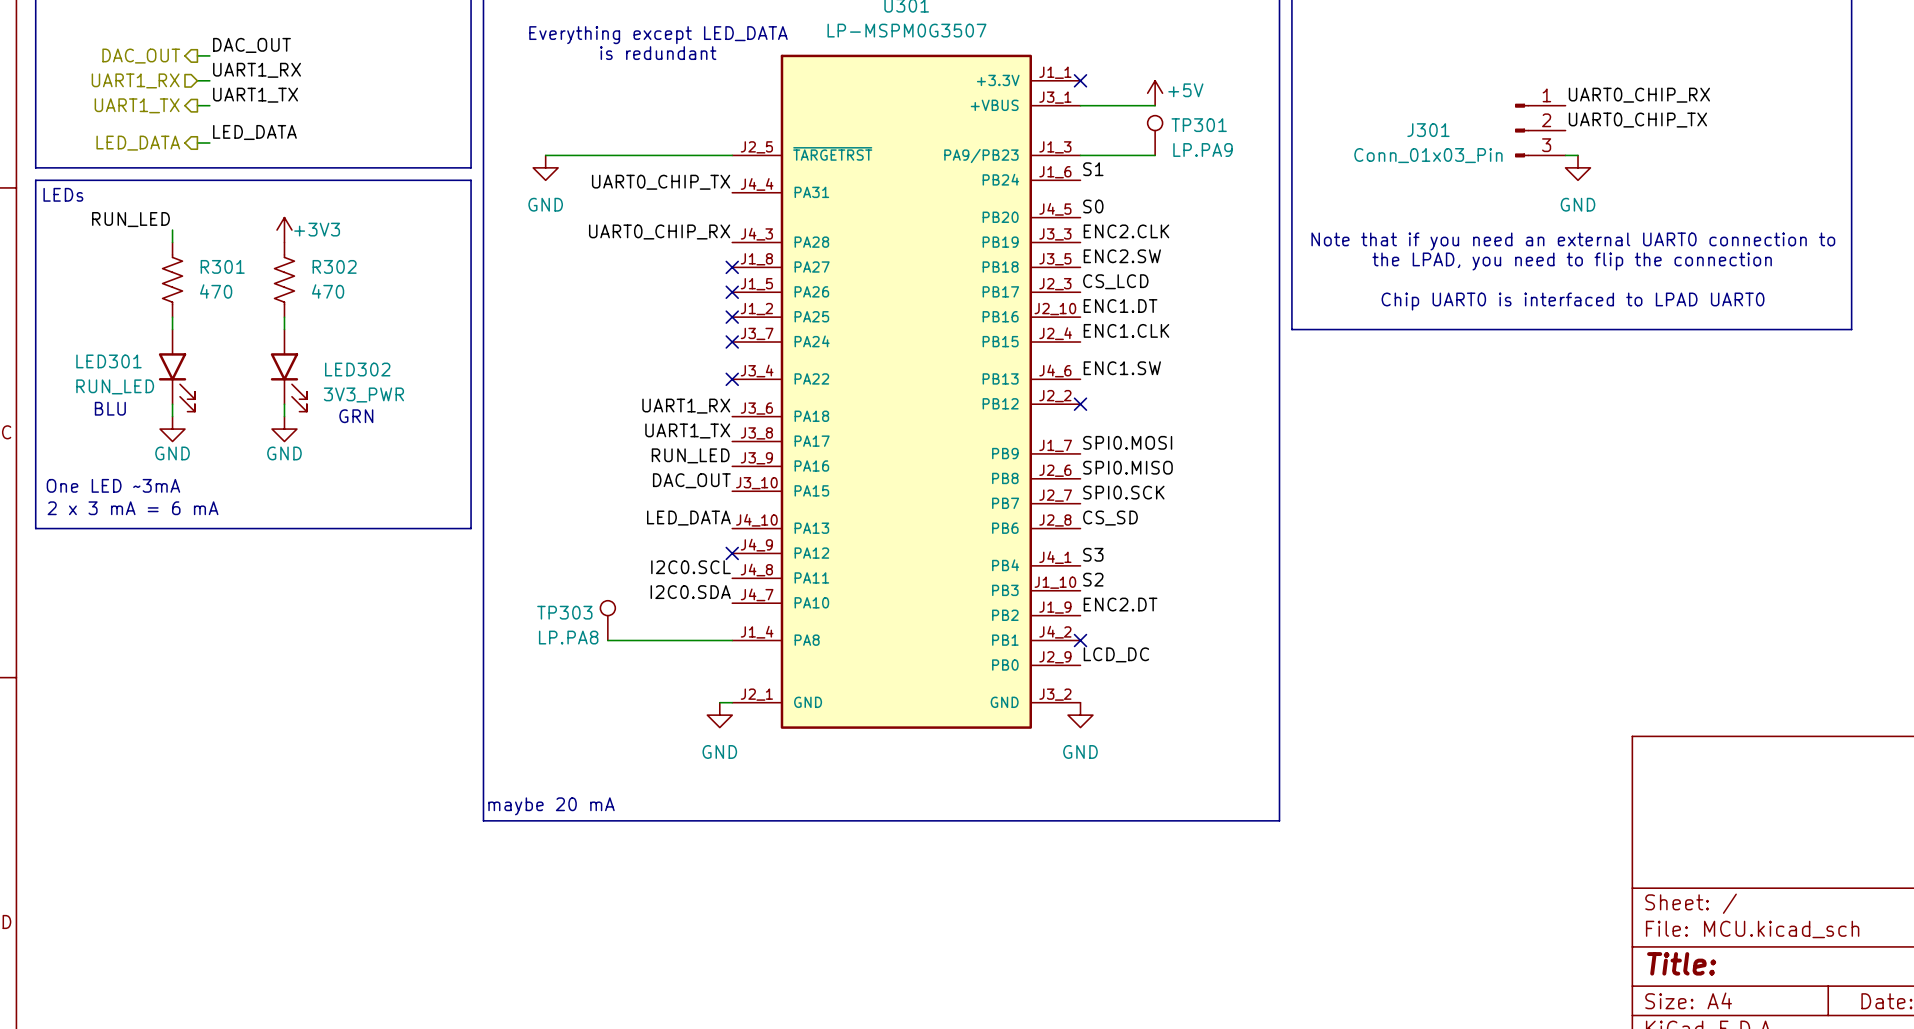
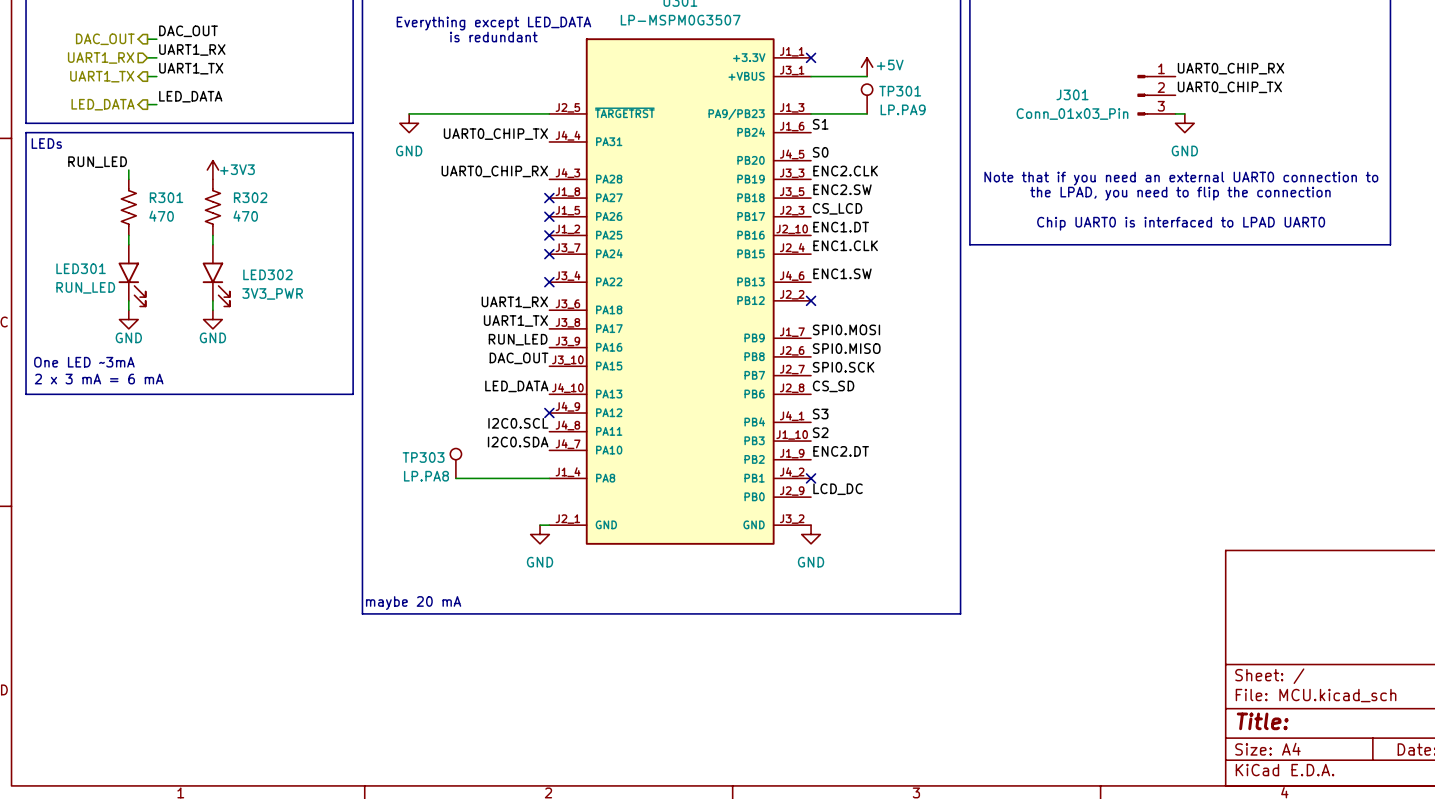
text: BLU (110, 408) -> none
text: GRN (356, 416) -> none

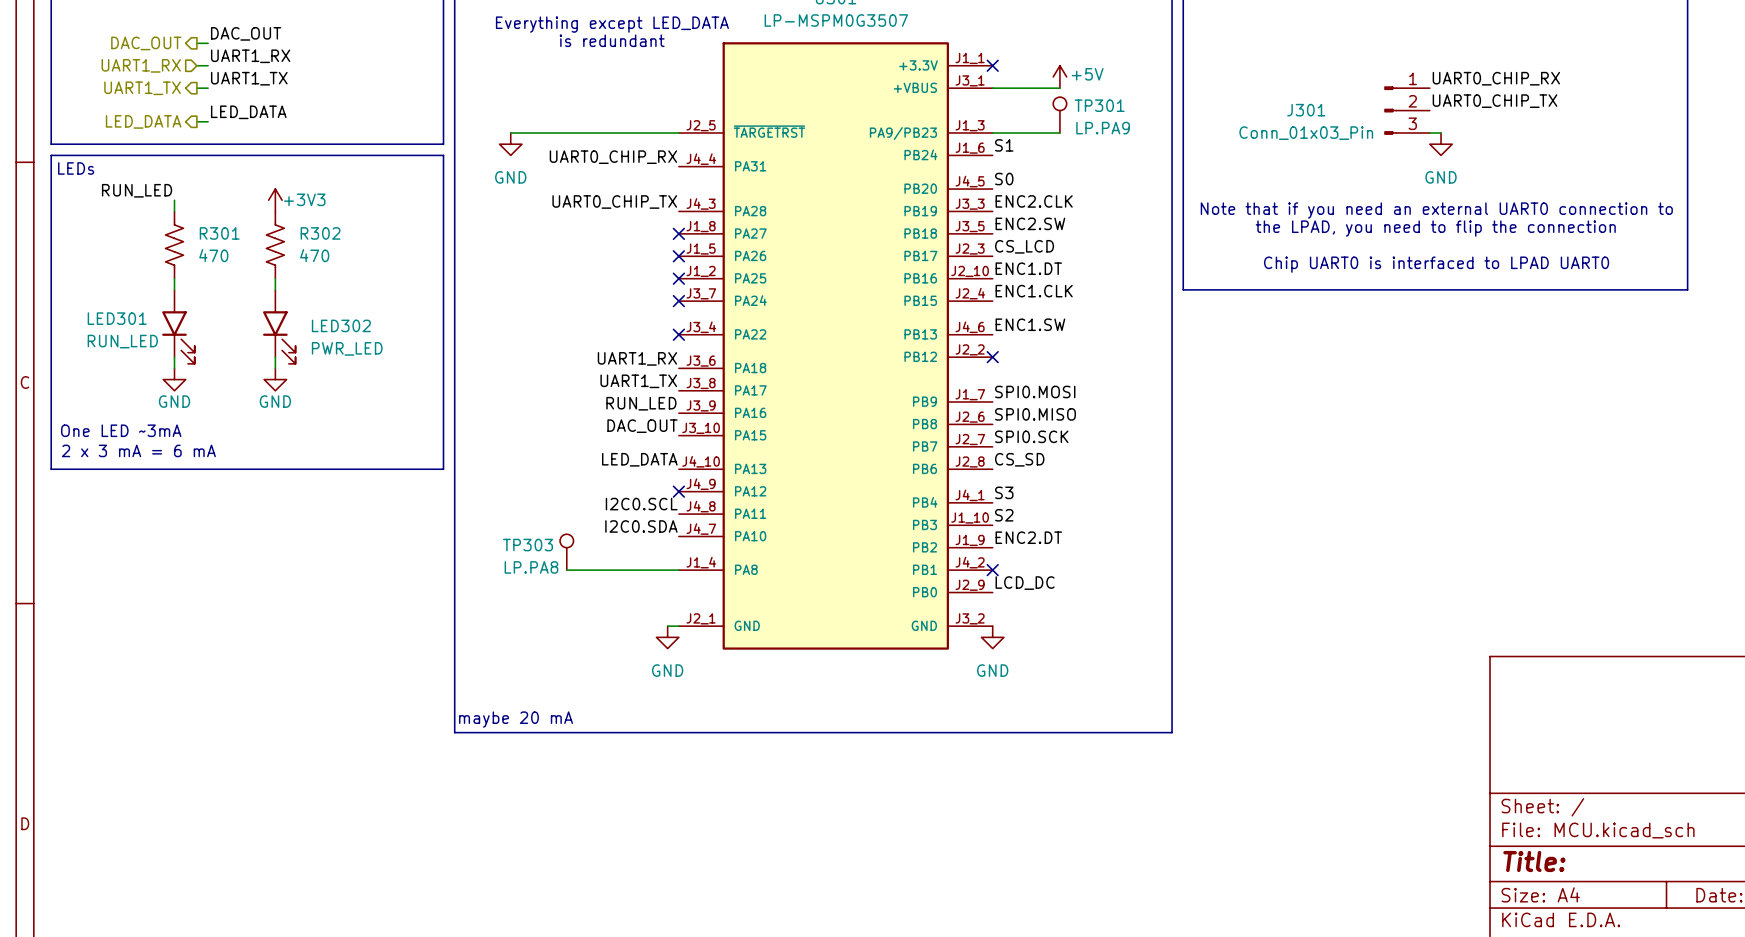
label: UART0_CHIP_TX (495, 134) -> UART0_CHIP_RX (613, 157)
label: UART0_CHIP_RX (494, 171) -> UART0_CHIP_TX (614, 201)
LED302 value: 3V3_PWR (272, 293) -> PWR_LED (347, 348)

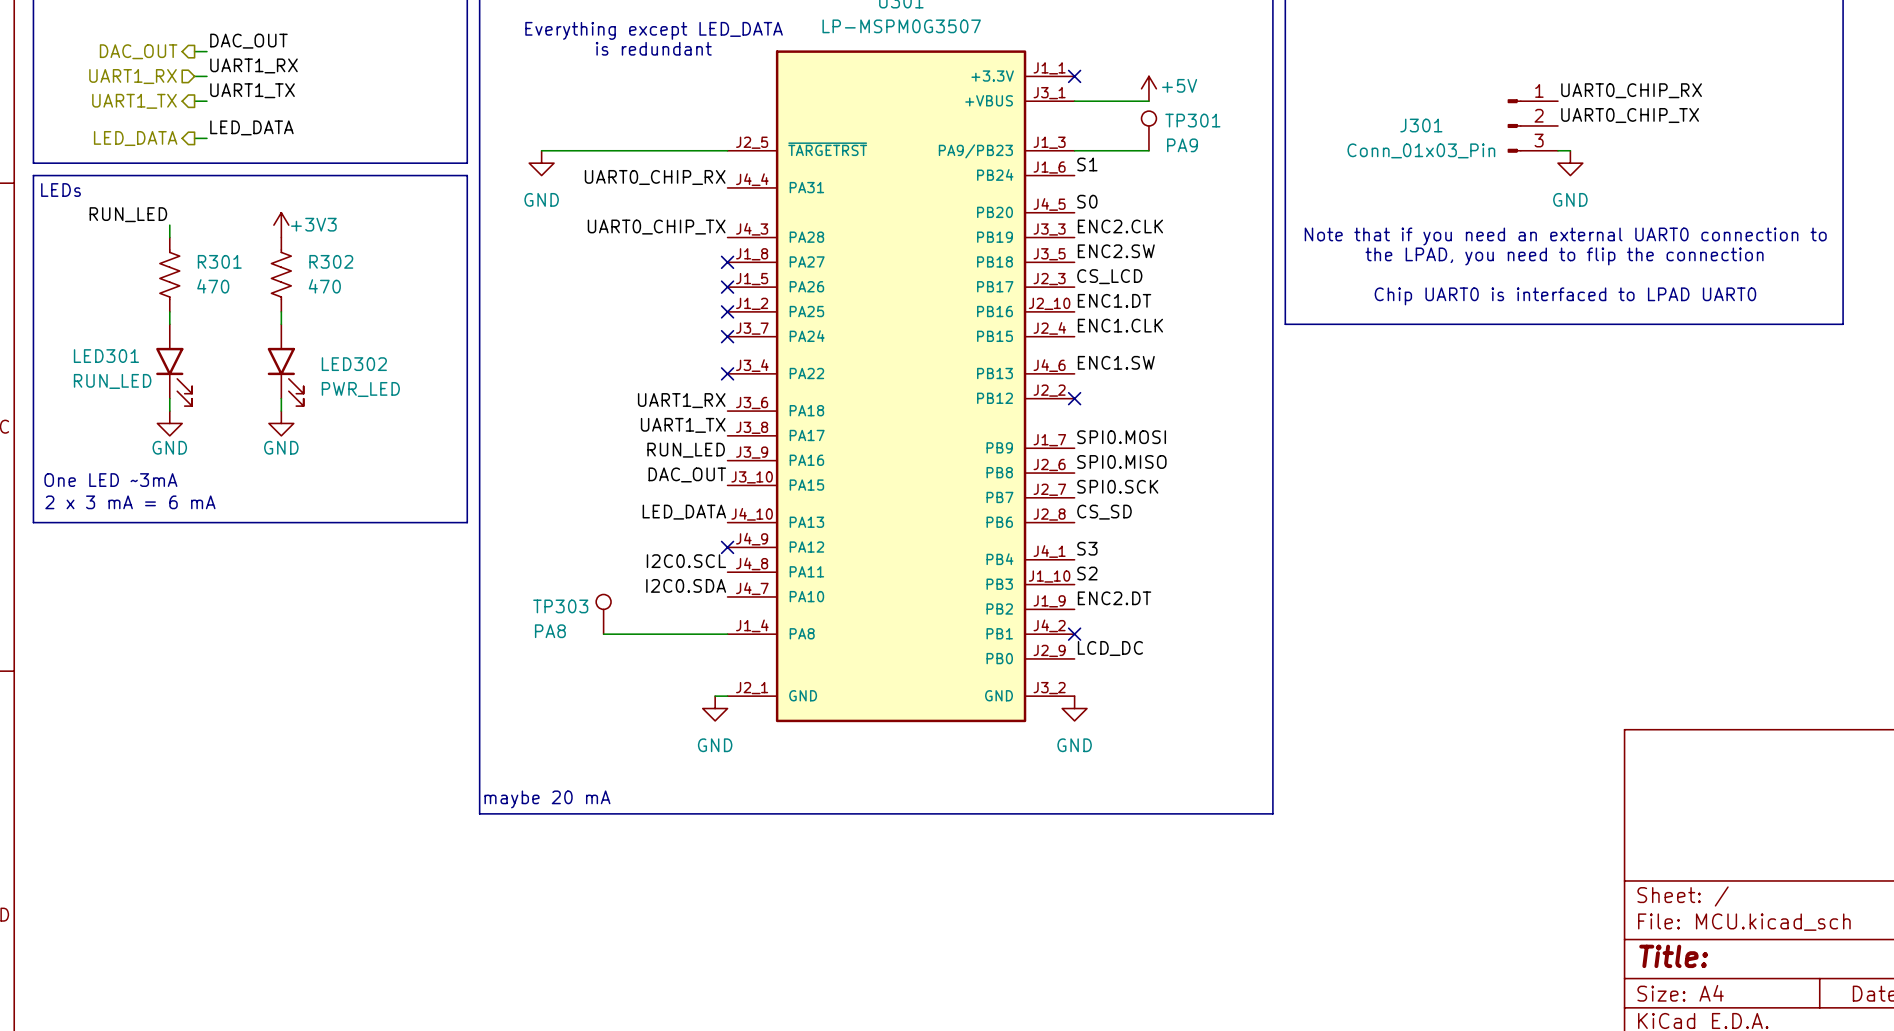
TP301 value: LP.PA9 (1103, 128) -> PA9 (1182, 145)
TP303 value: LP.PA8 (531, 567) -> PA8 (550, 631)

